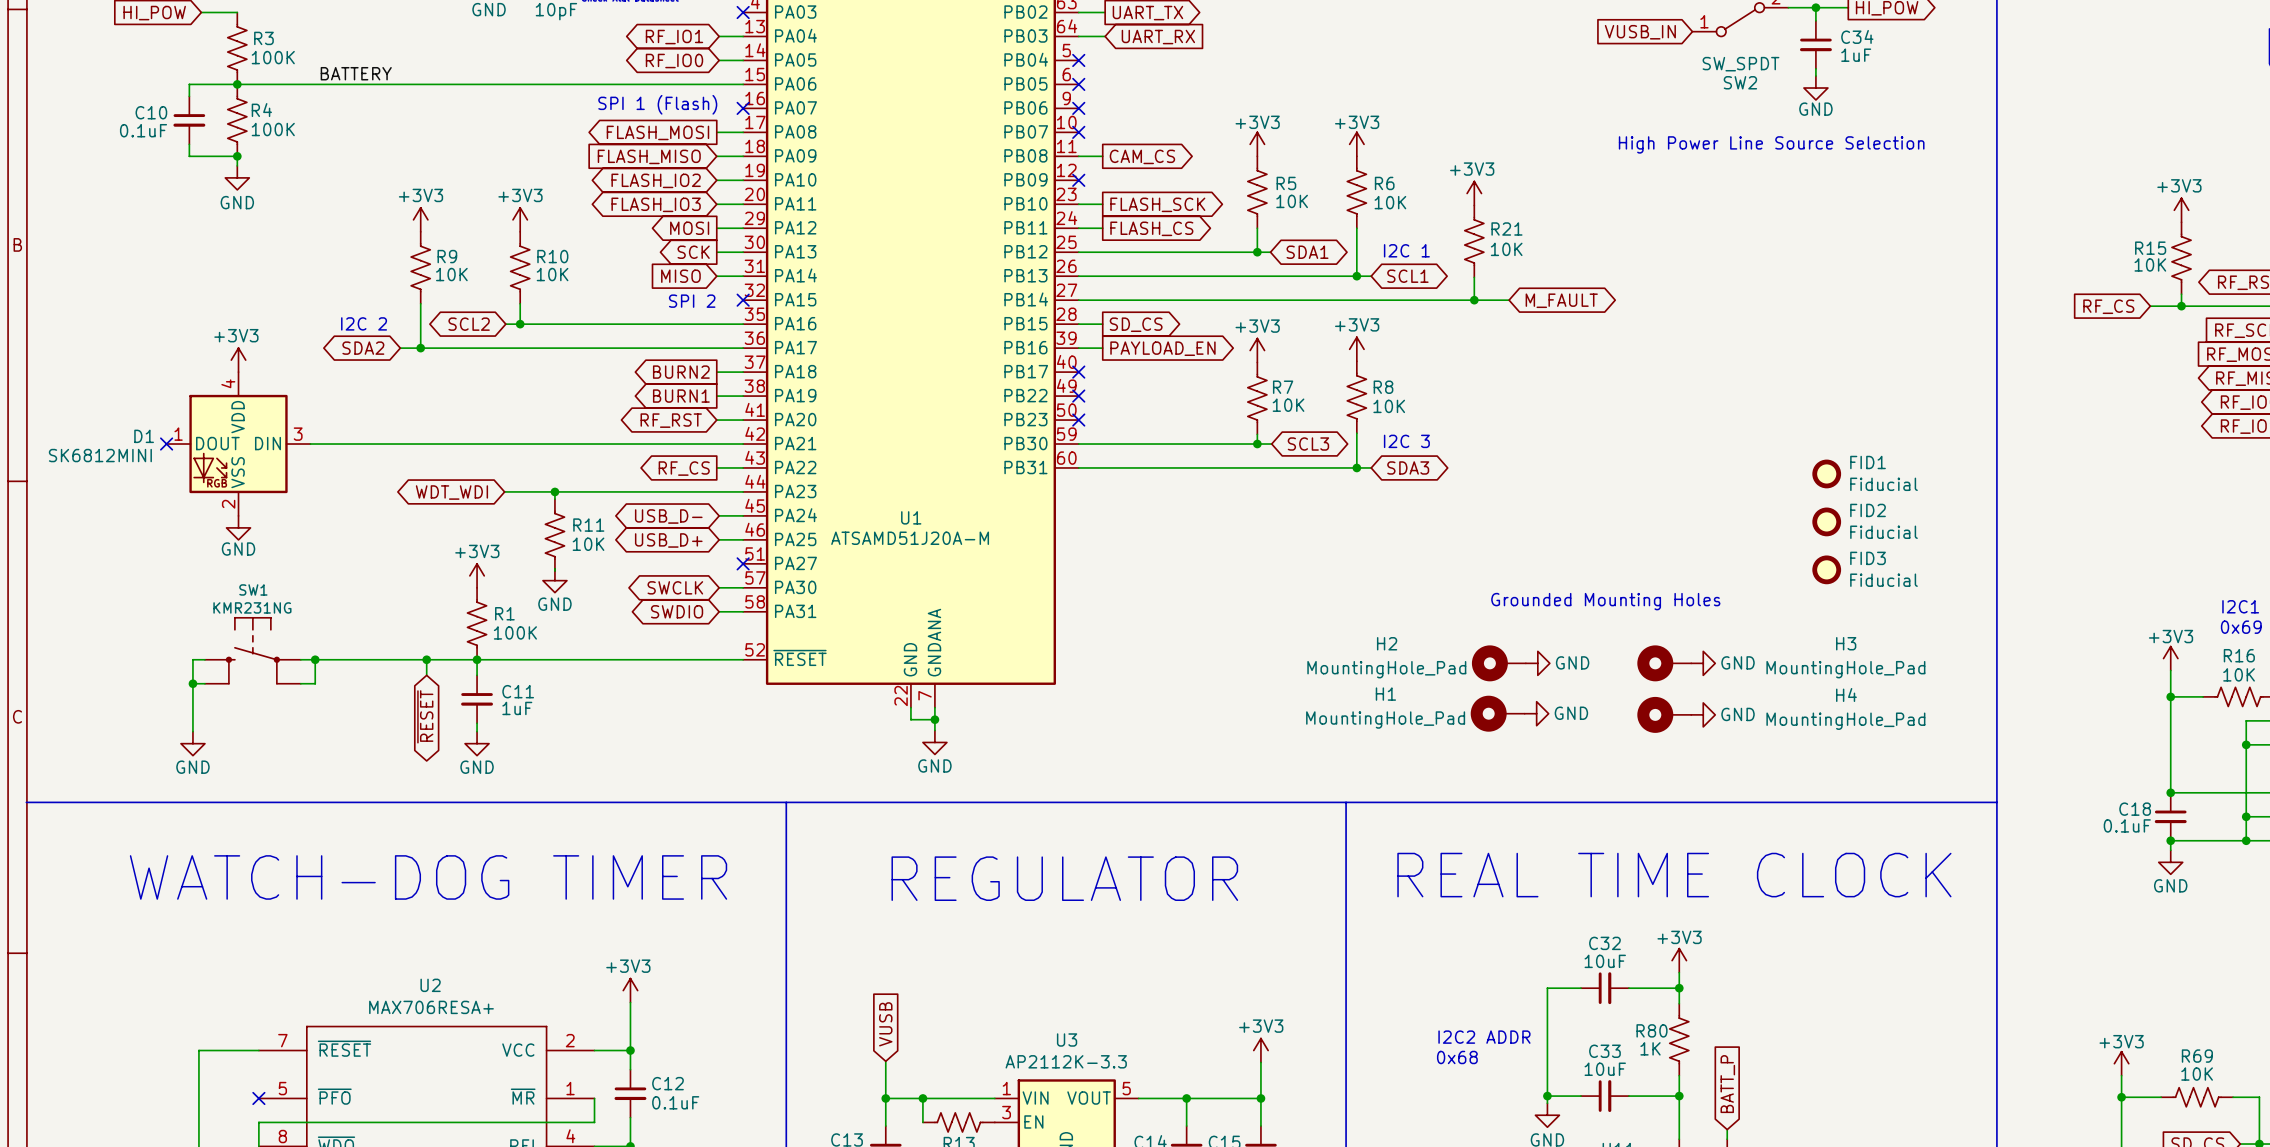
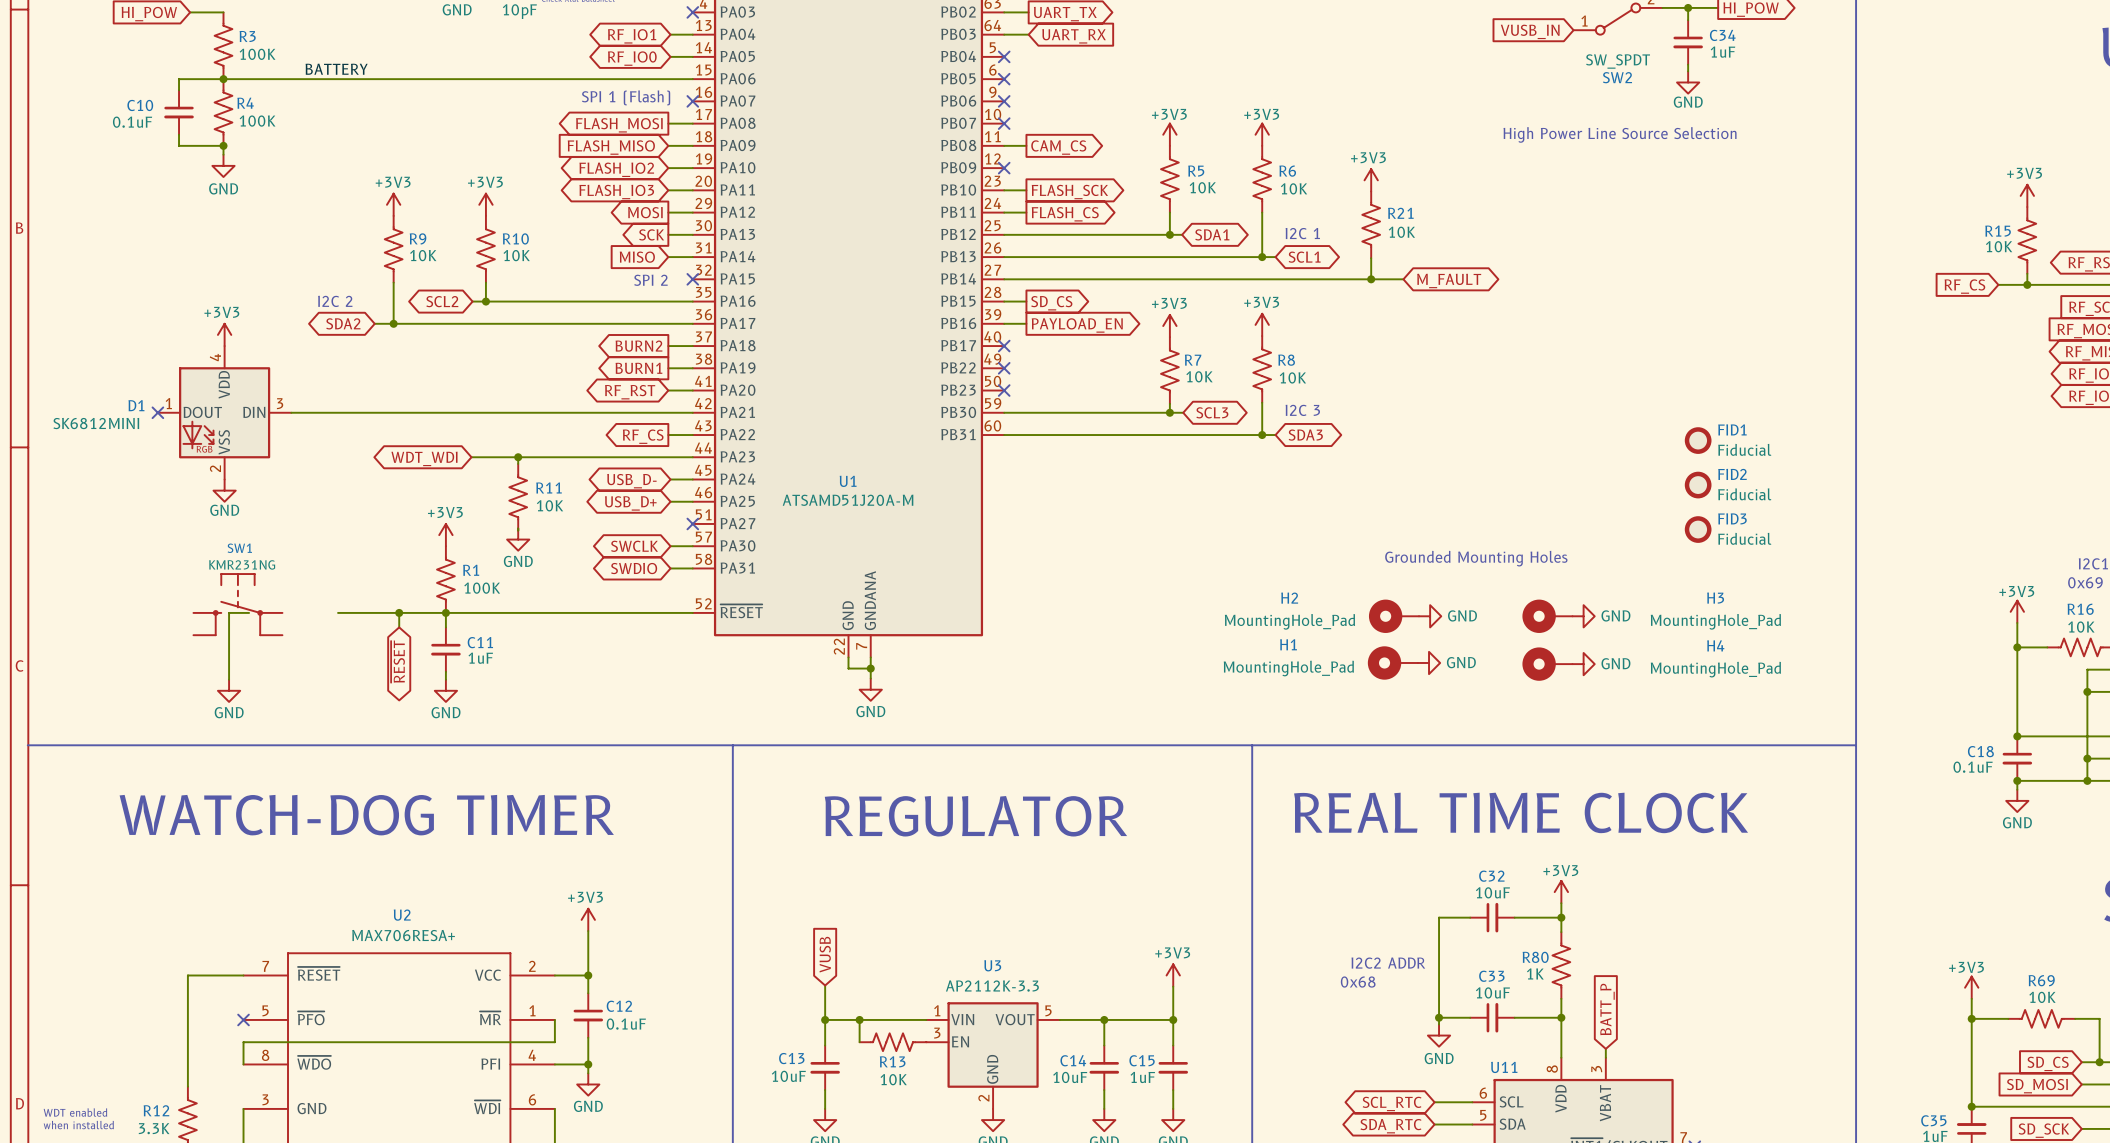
wire: (204, 659) (192, 659) (192, 731) -> none
wire: none -> (249, 612) (229, 612) (229, 679)
wire: (300, 659) (360, 659) -> none
wire: (315, 659) (315, 683) (300, 683) -> none
junction: (315, 659) -> none
wire: (192, 683) (204, 683) -> none
junction: (192, 683) -> none
power symbol position: GND (192, 743) -> GND (229, 690)

